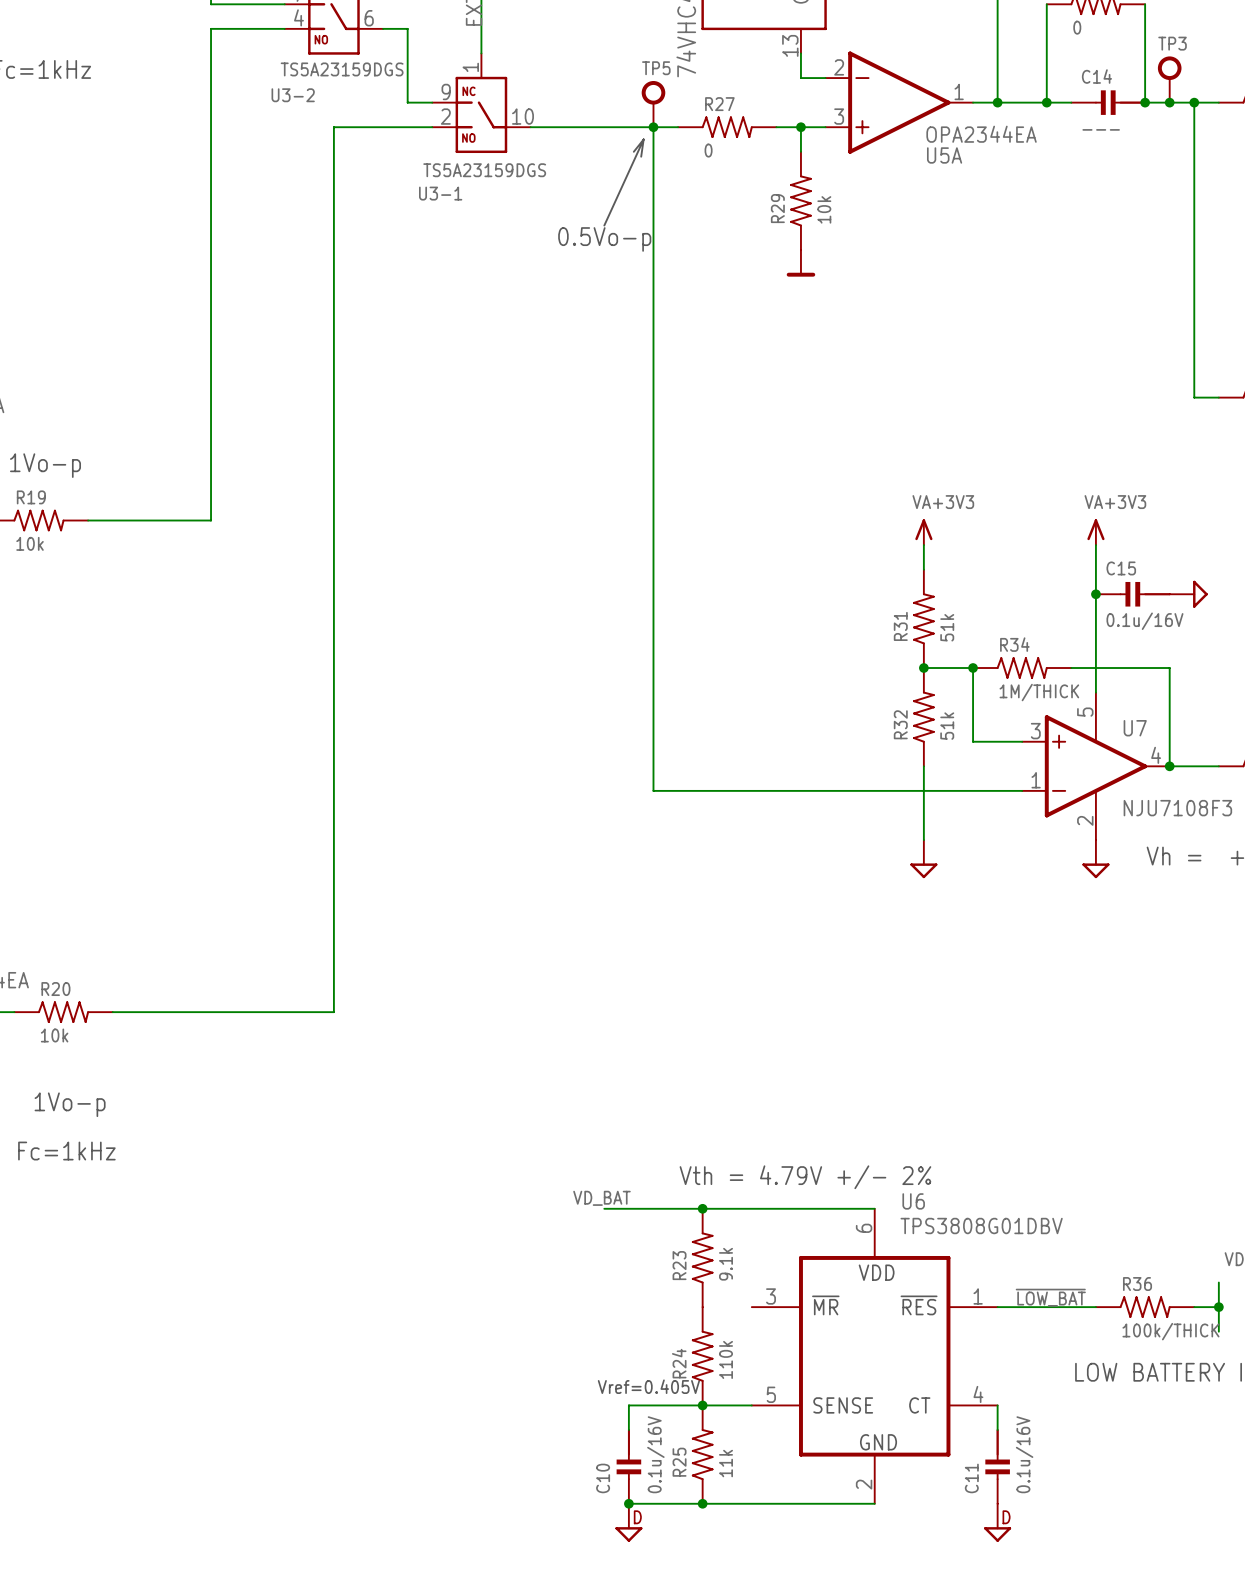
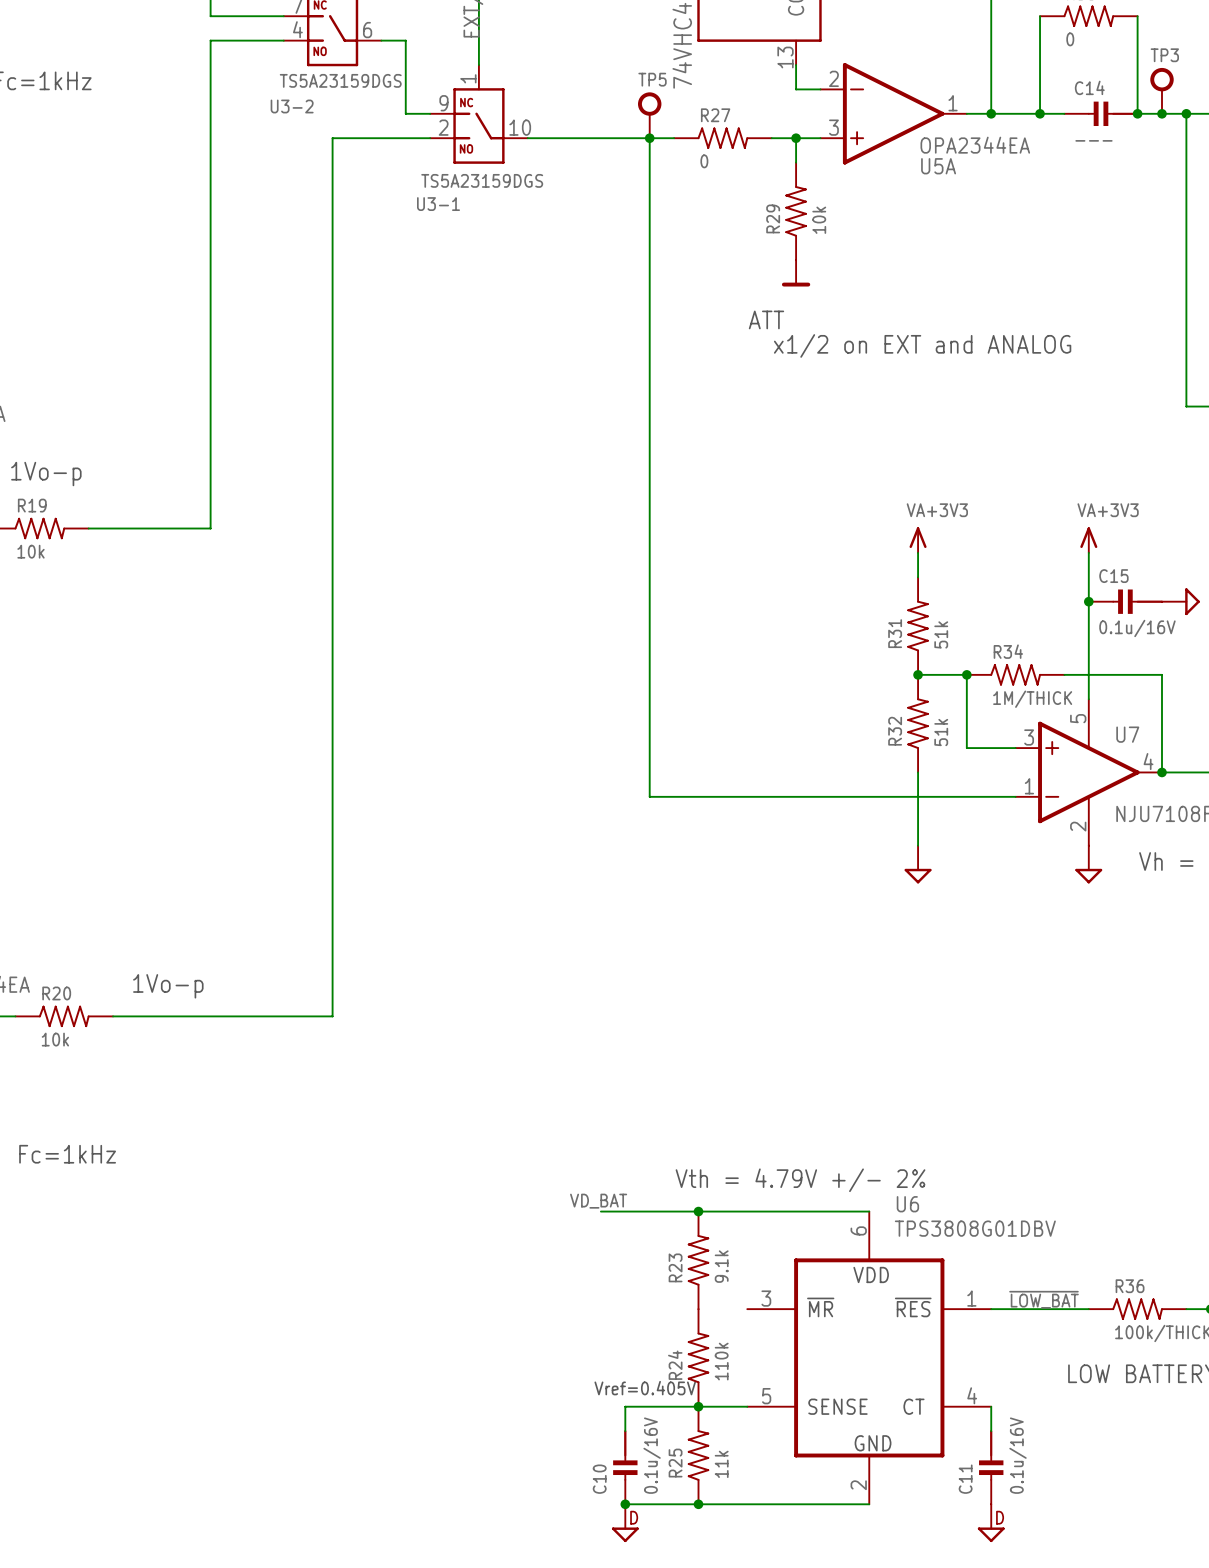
line: (643, 139) (604, 225) -> none
line: (643, 139) (641, 156) -> none
line: (643, 139) (633, 151) -> none
text: 0.5Vo-p (604, 239) -> none
text: none -> ATT (766, 319)
text: none -> x1/2 on EXT and ANALOG (922, 345)
text position: 1Vo-p (70, 1104) -> 1Vo-p (168, 986)

